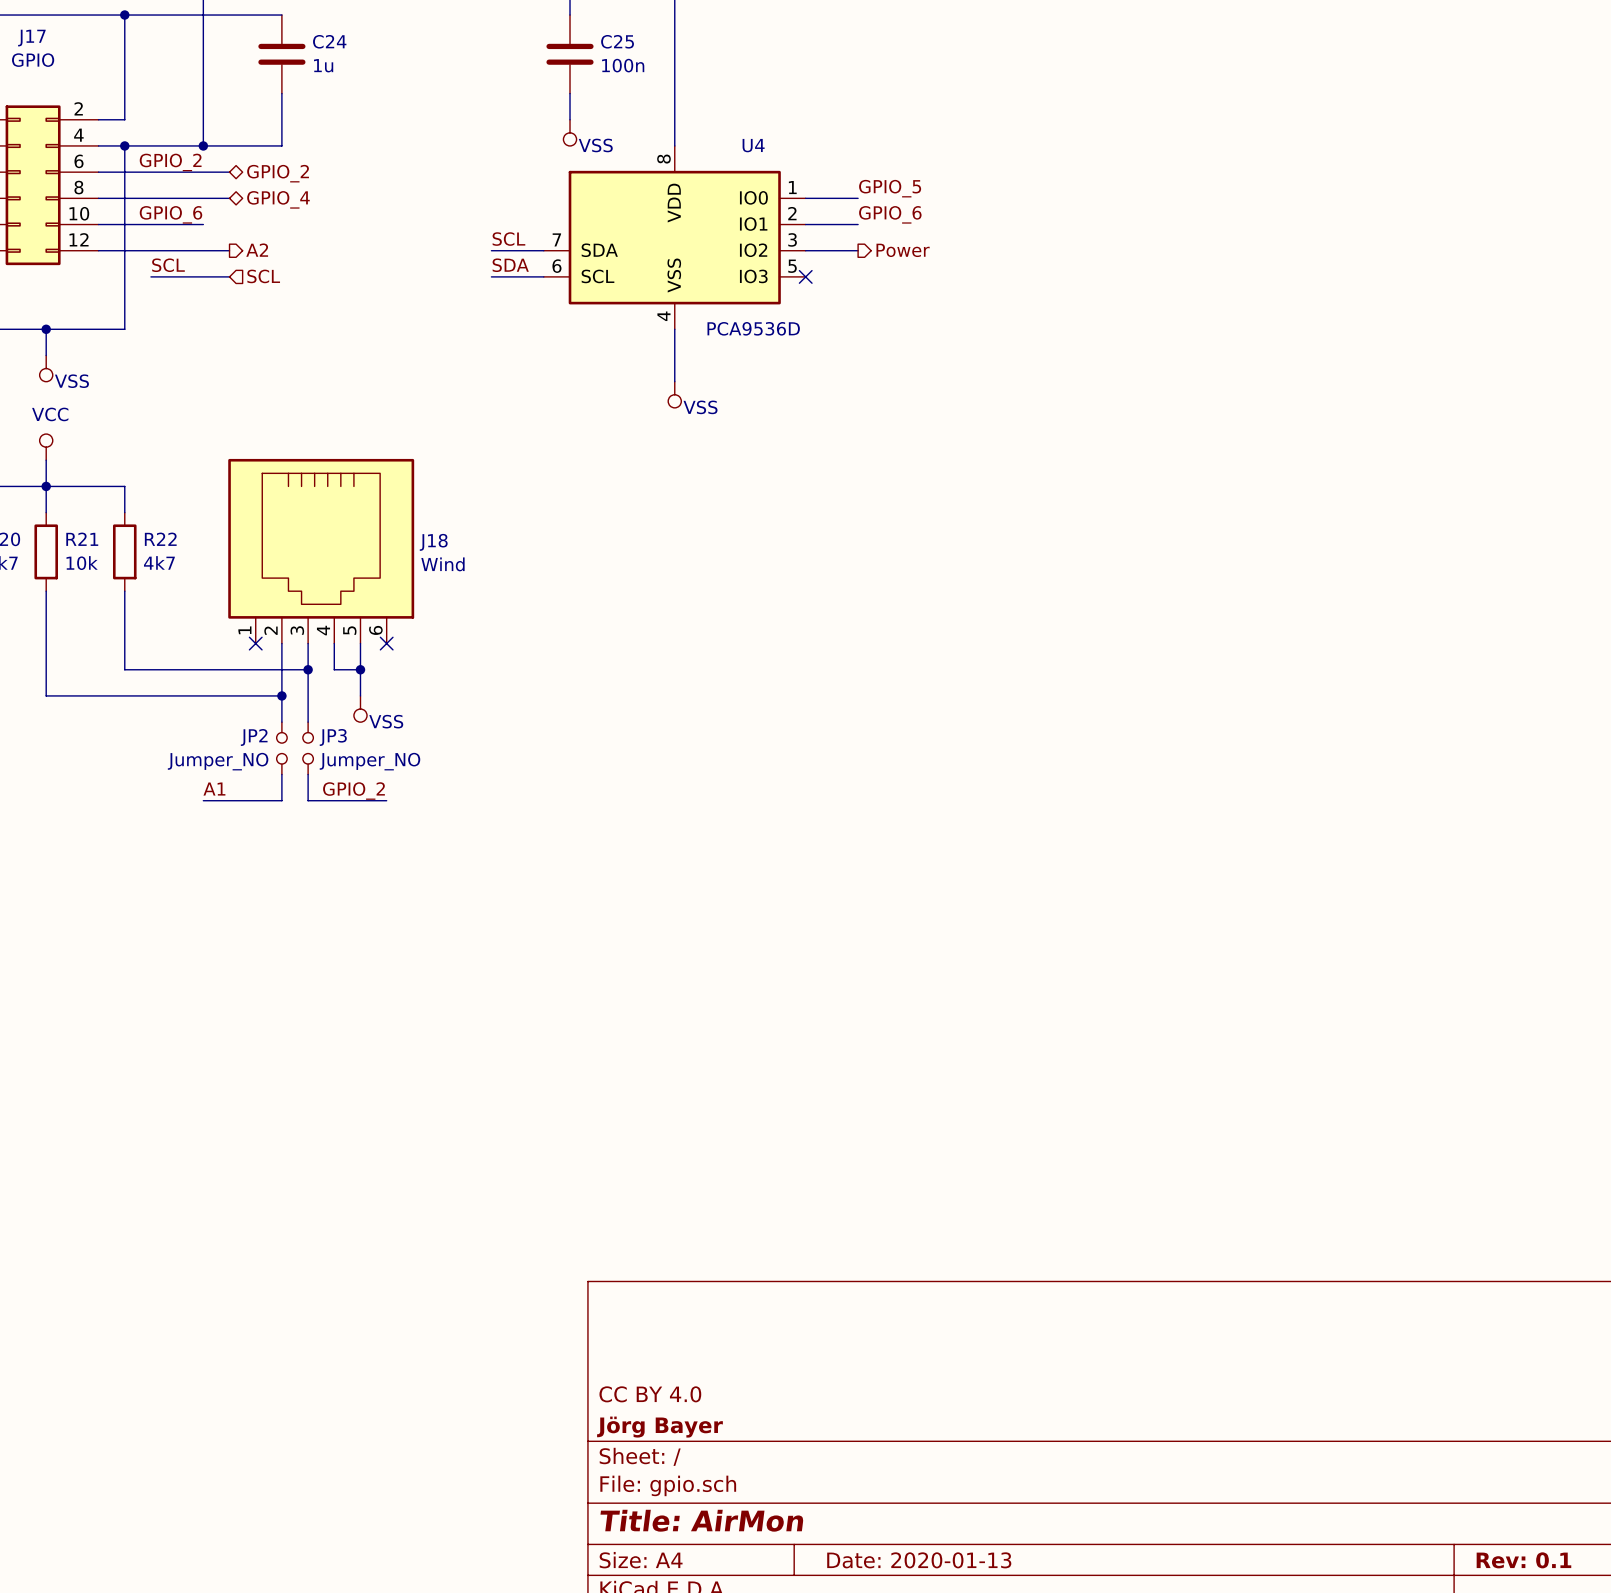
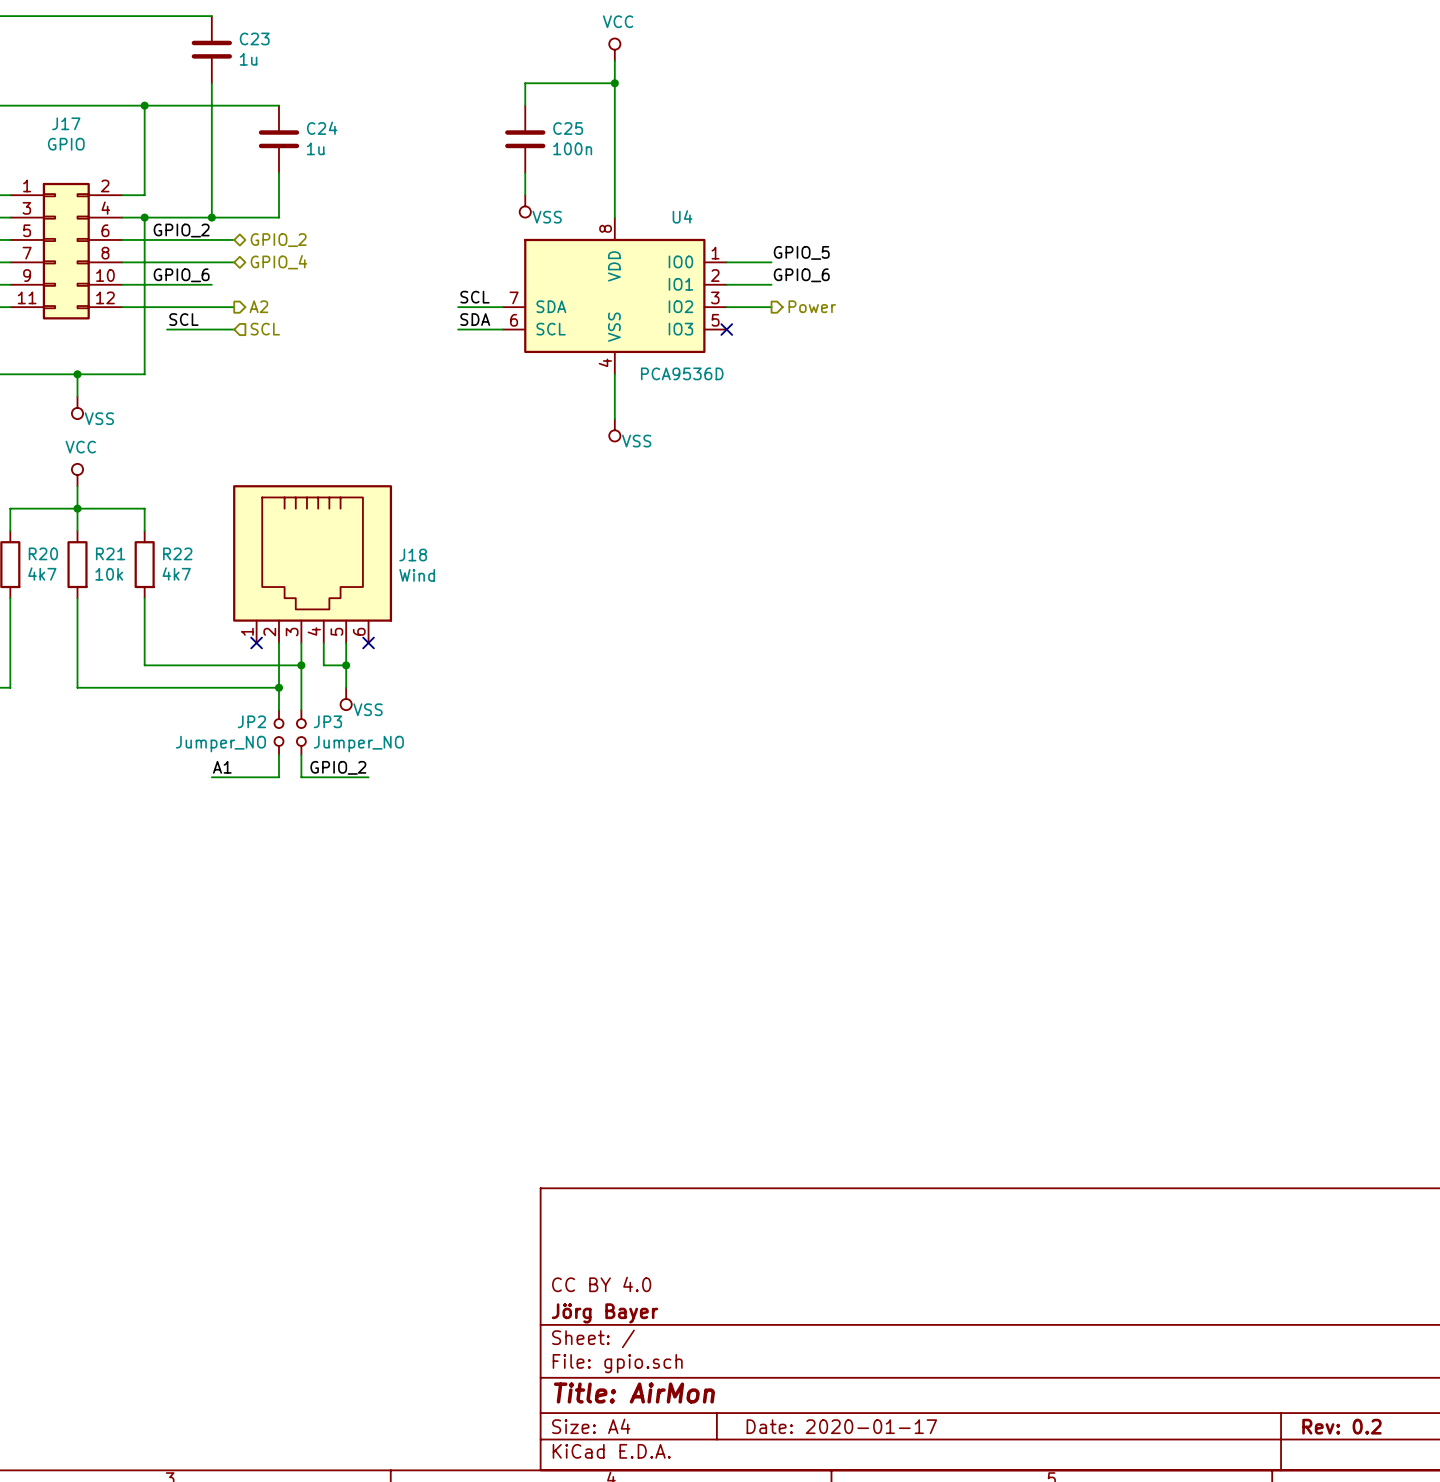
title block: Date: 2020-01-13 (919, 1560) -> Date: 2020-01-17 (841, 1426)
title block: Rev: 0.1 (1523, 1560) -> Rev: 0.2 (1341, 1426)

